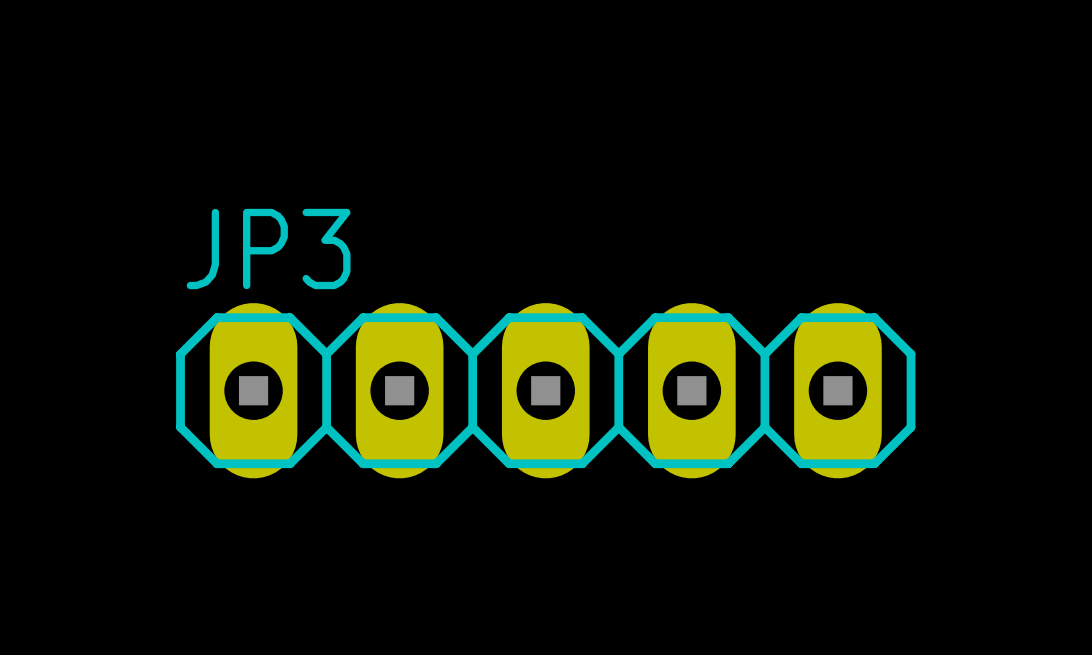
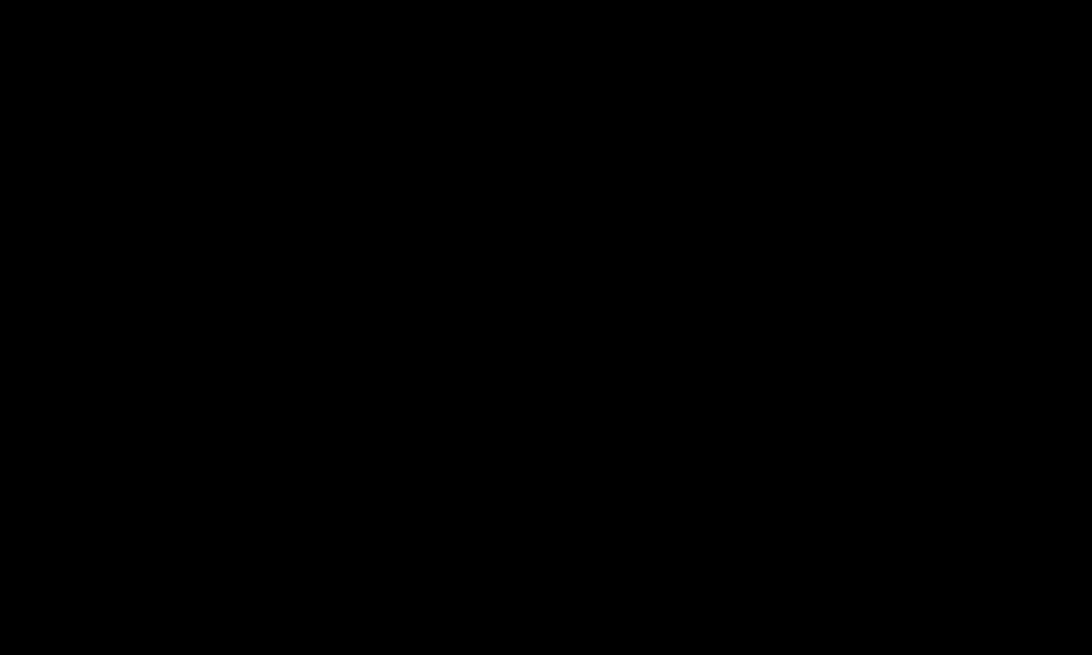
JP3: (545, 390) -> none

